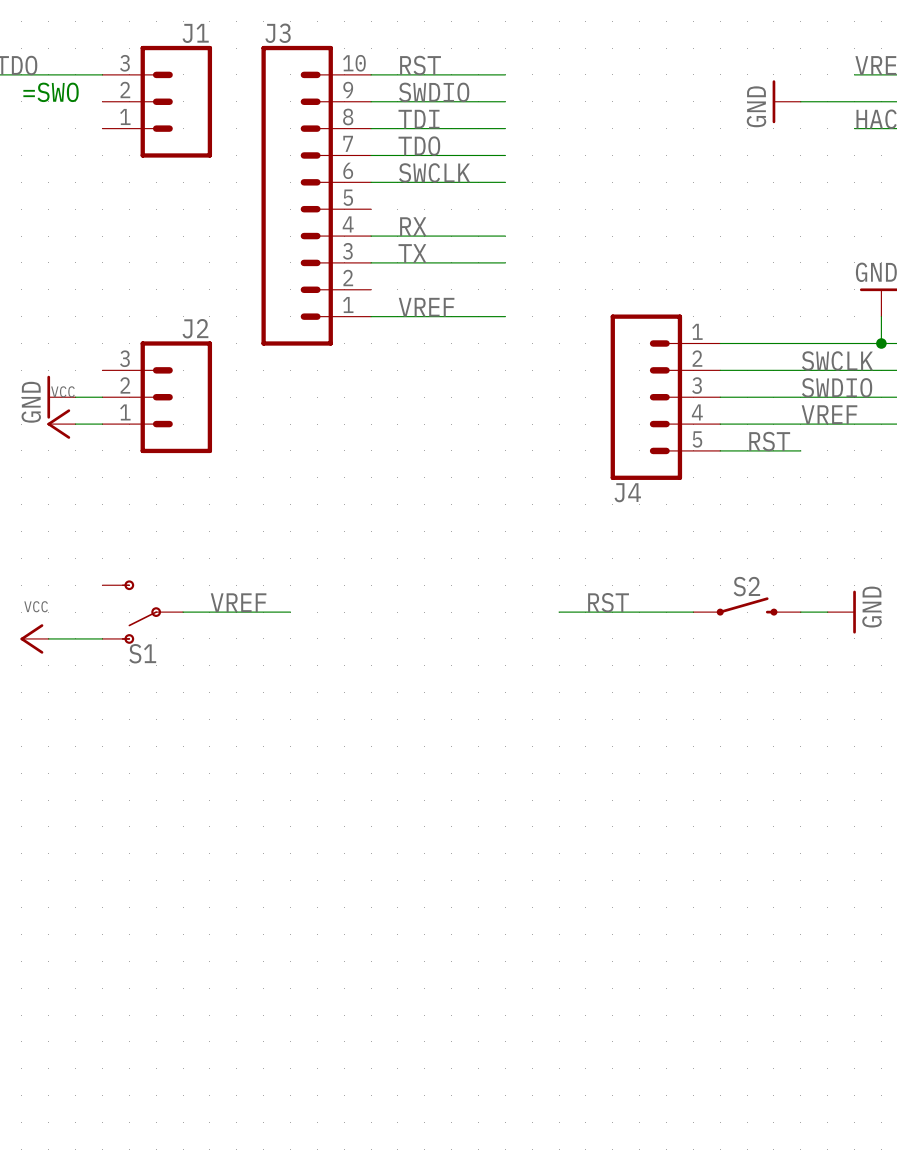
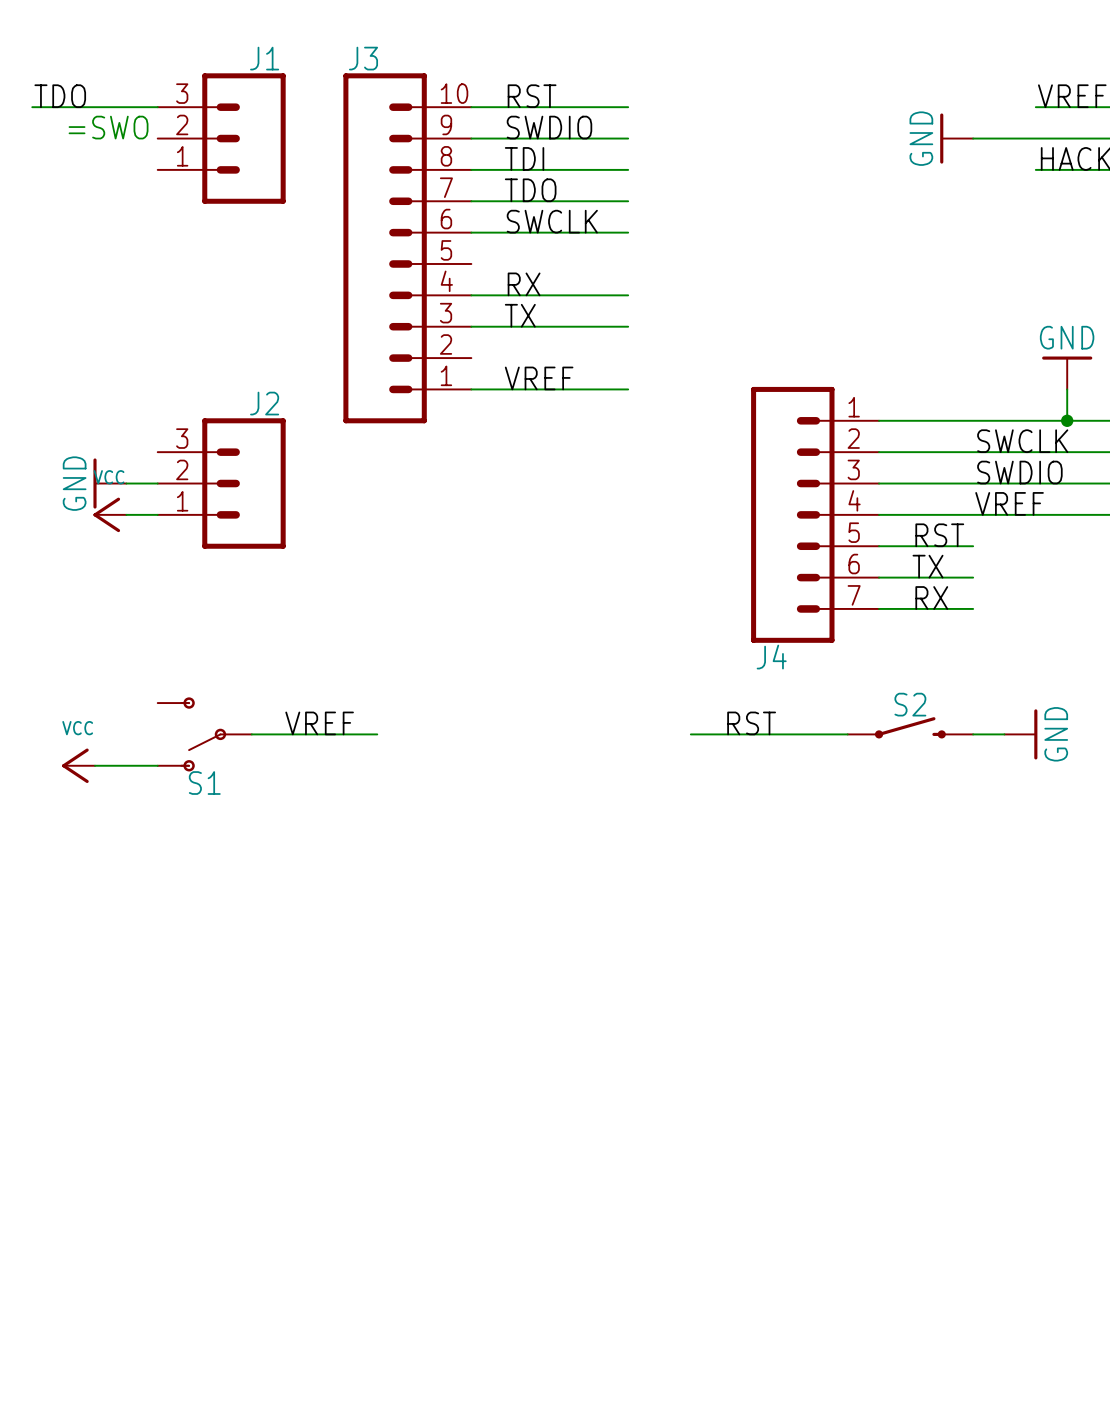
J4 symbol: [610, 314, 721, 480] -> [751, 386, 880, 643]
label: none -> TX (928, 566)
wire: none -> (879, 577) (973, 577)
J4 name position: J4 (627, 492) -> J4 (771, 657)
label: none -> RX (931, 597)
wire: none -> (879, 608) (973, 608)

